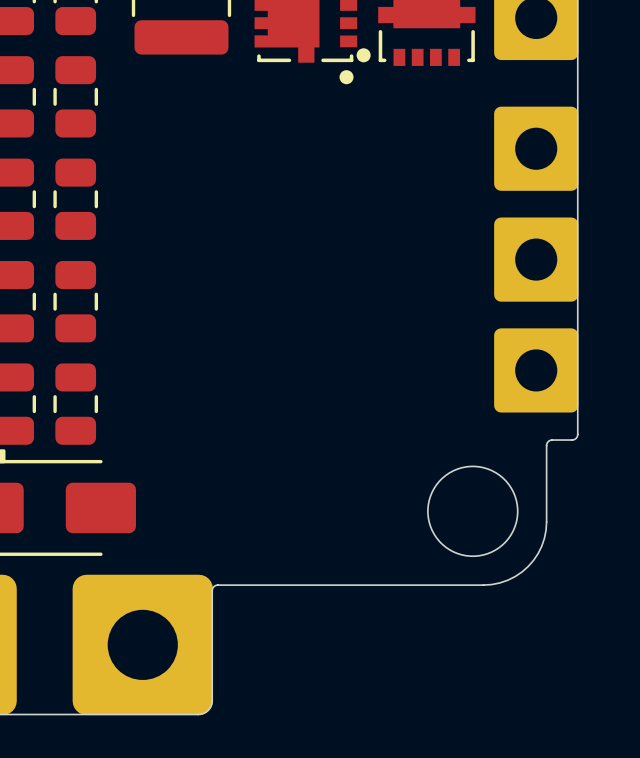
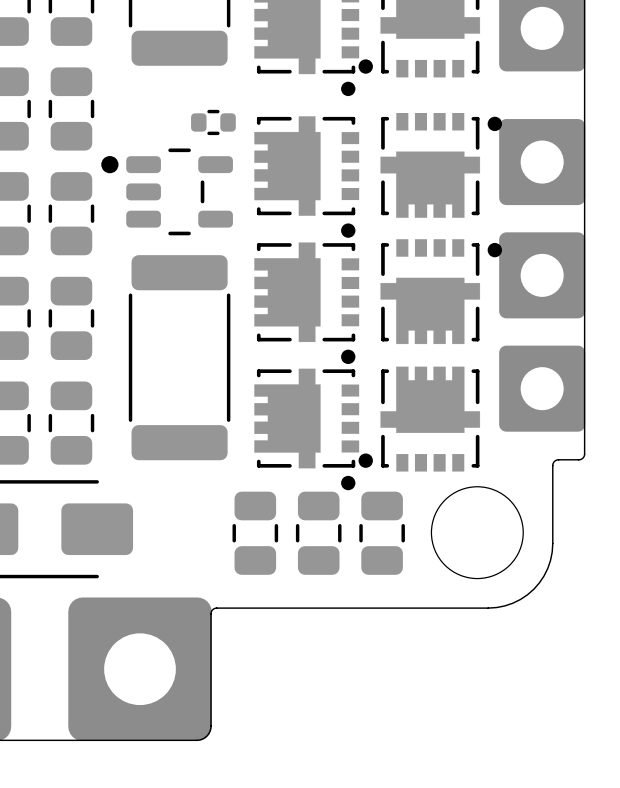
part: none -> (213, 122)
part: none -> (441, 165)
part: none -> (306, 177)
part: none -> (167, 191)
part: none -> (441, 291)
part: none -> (306, 303)
part: none -> (179, 357)
part: none -> (419, 419)
part: none -> (306, 429)
part: none -> (255, 533)
part: none -> (318, 533)
part: none -> (382, 533)

